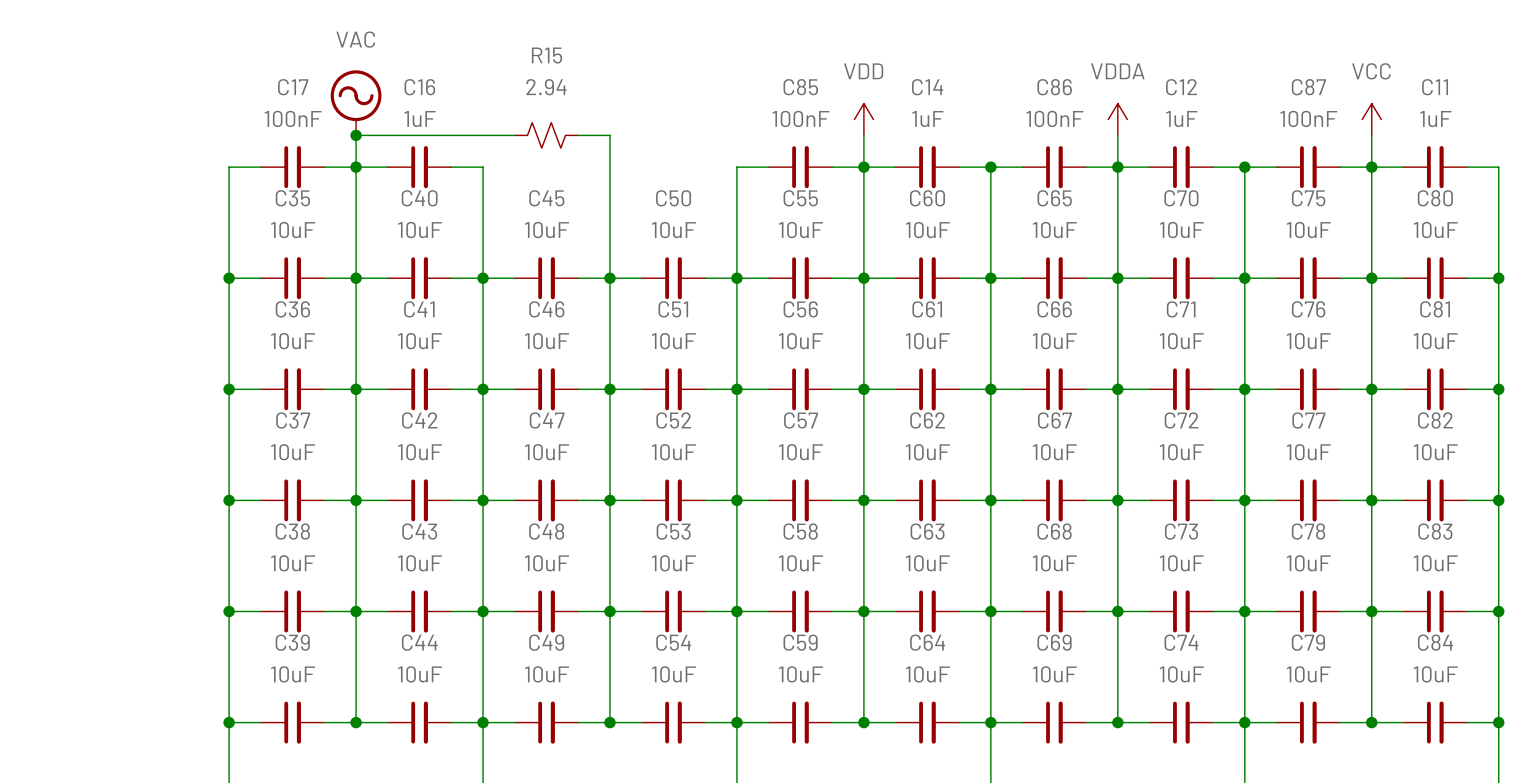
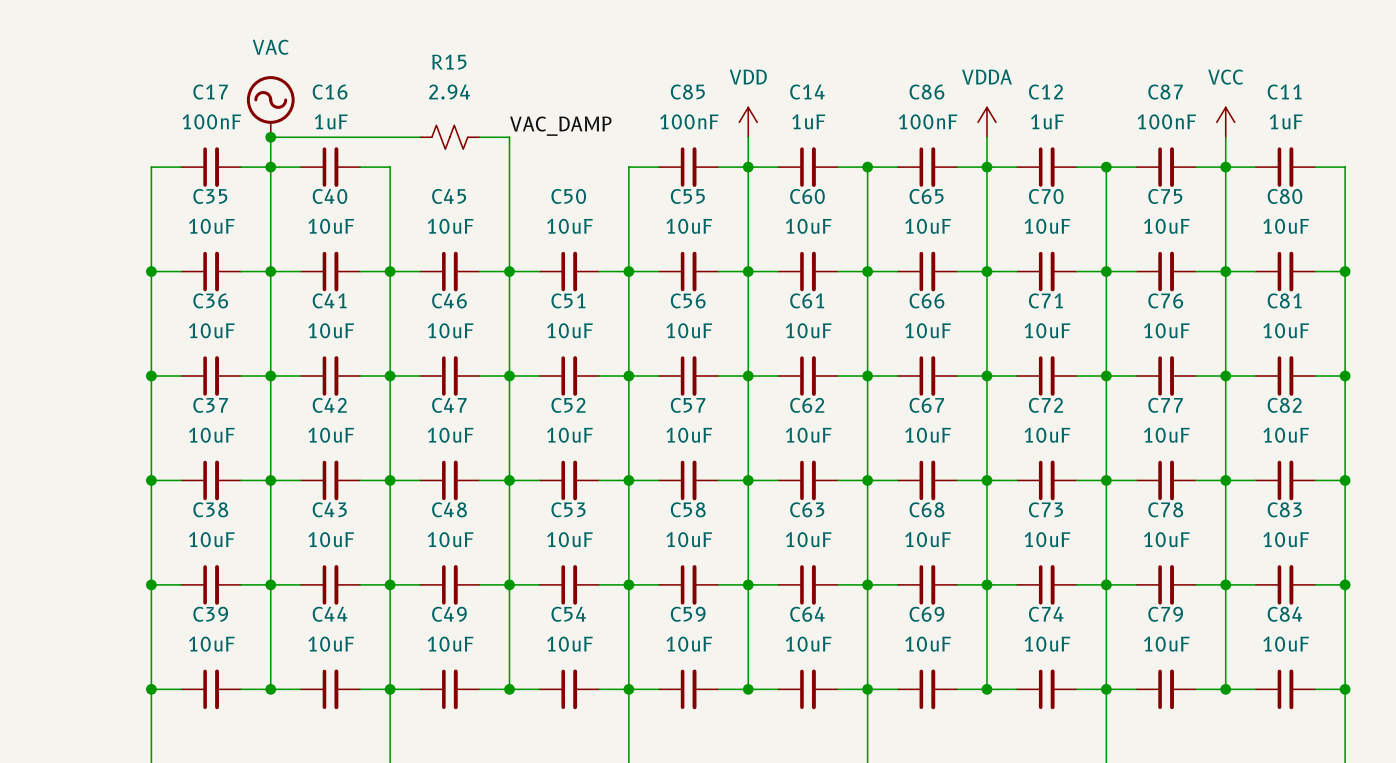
label: none -> VAC_DAMP (560, 126)

